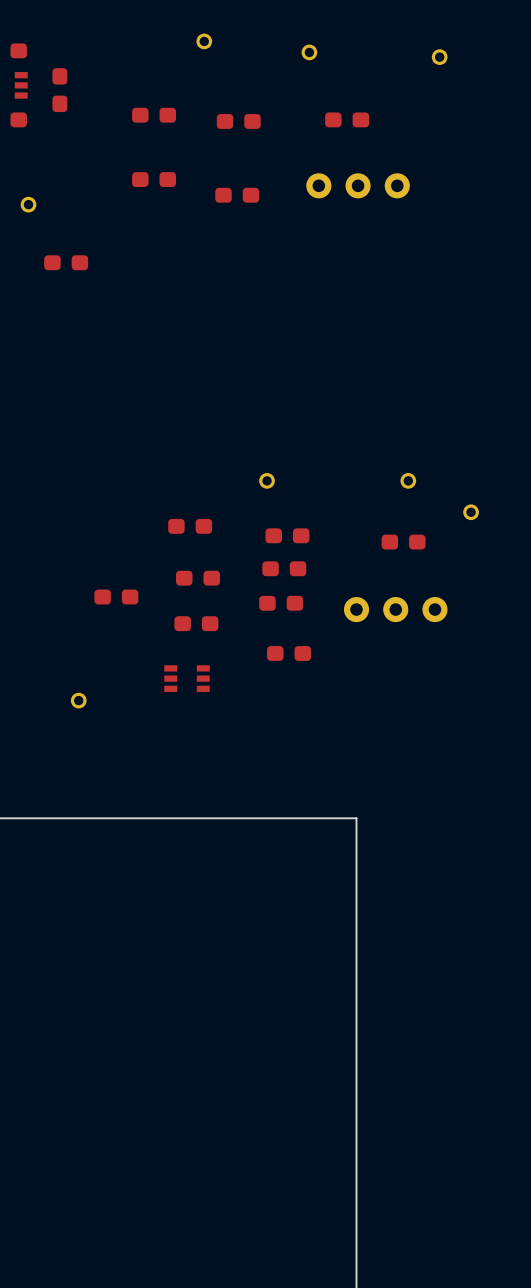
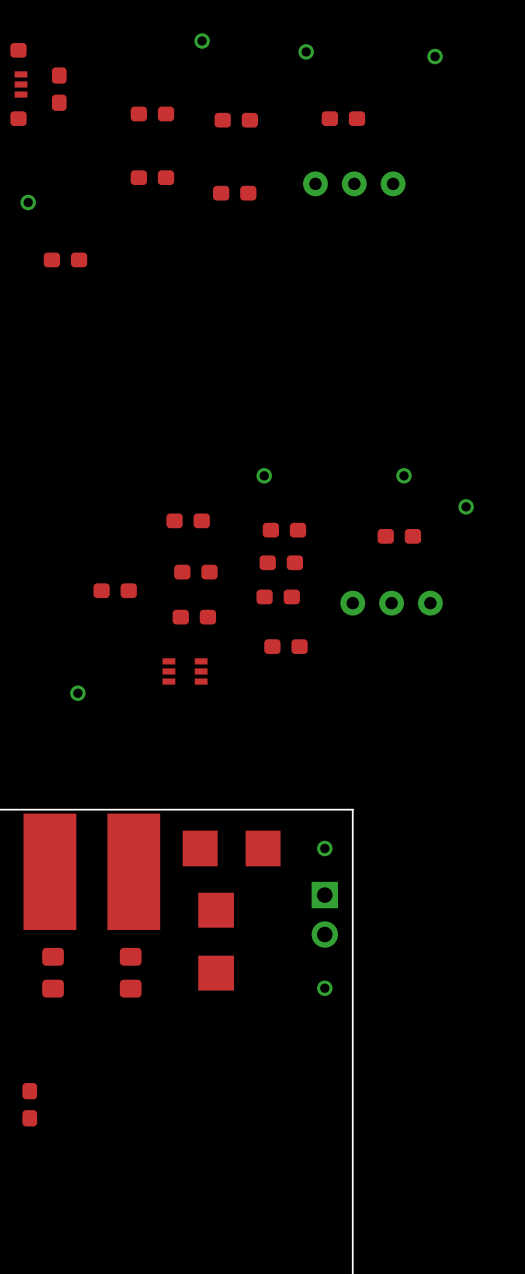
part: none -> (231, 848)
part: none -> (324, 848)
part: none -> (91, 871)
part: none -> (324, 914)
part: none -> (216, 941)
part: none -> (53, 972)
part: none -> (130, 972)
part: none -> (324, 988)
part: none -> (29, 1104)

